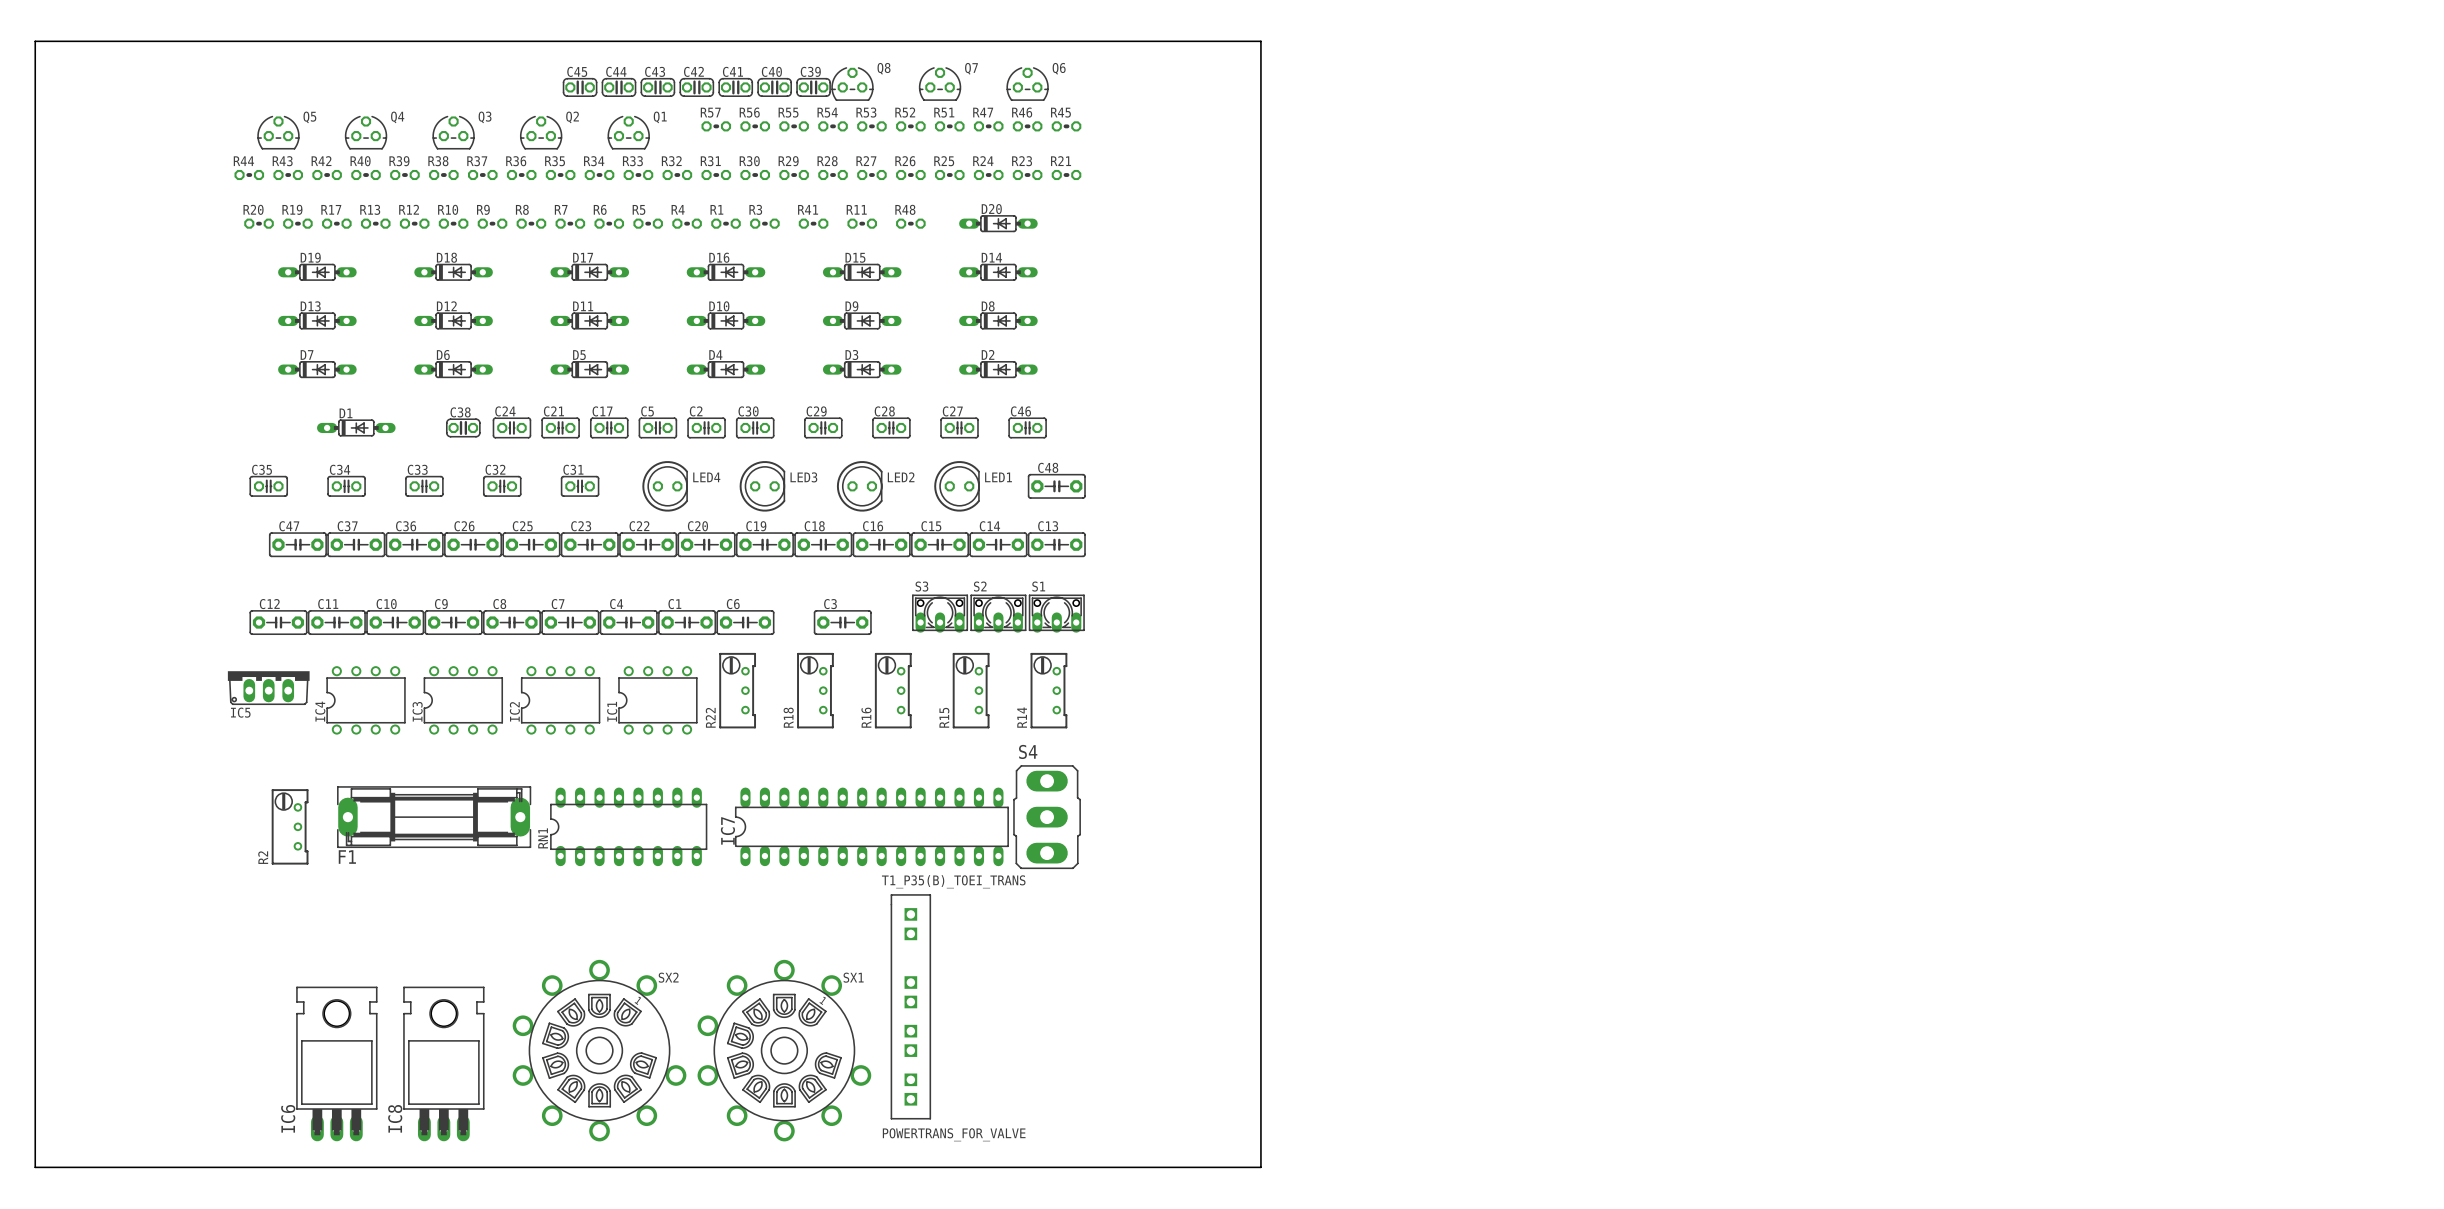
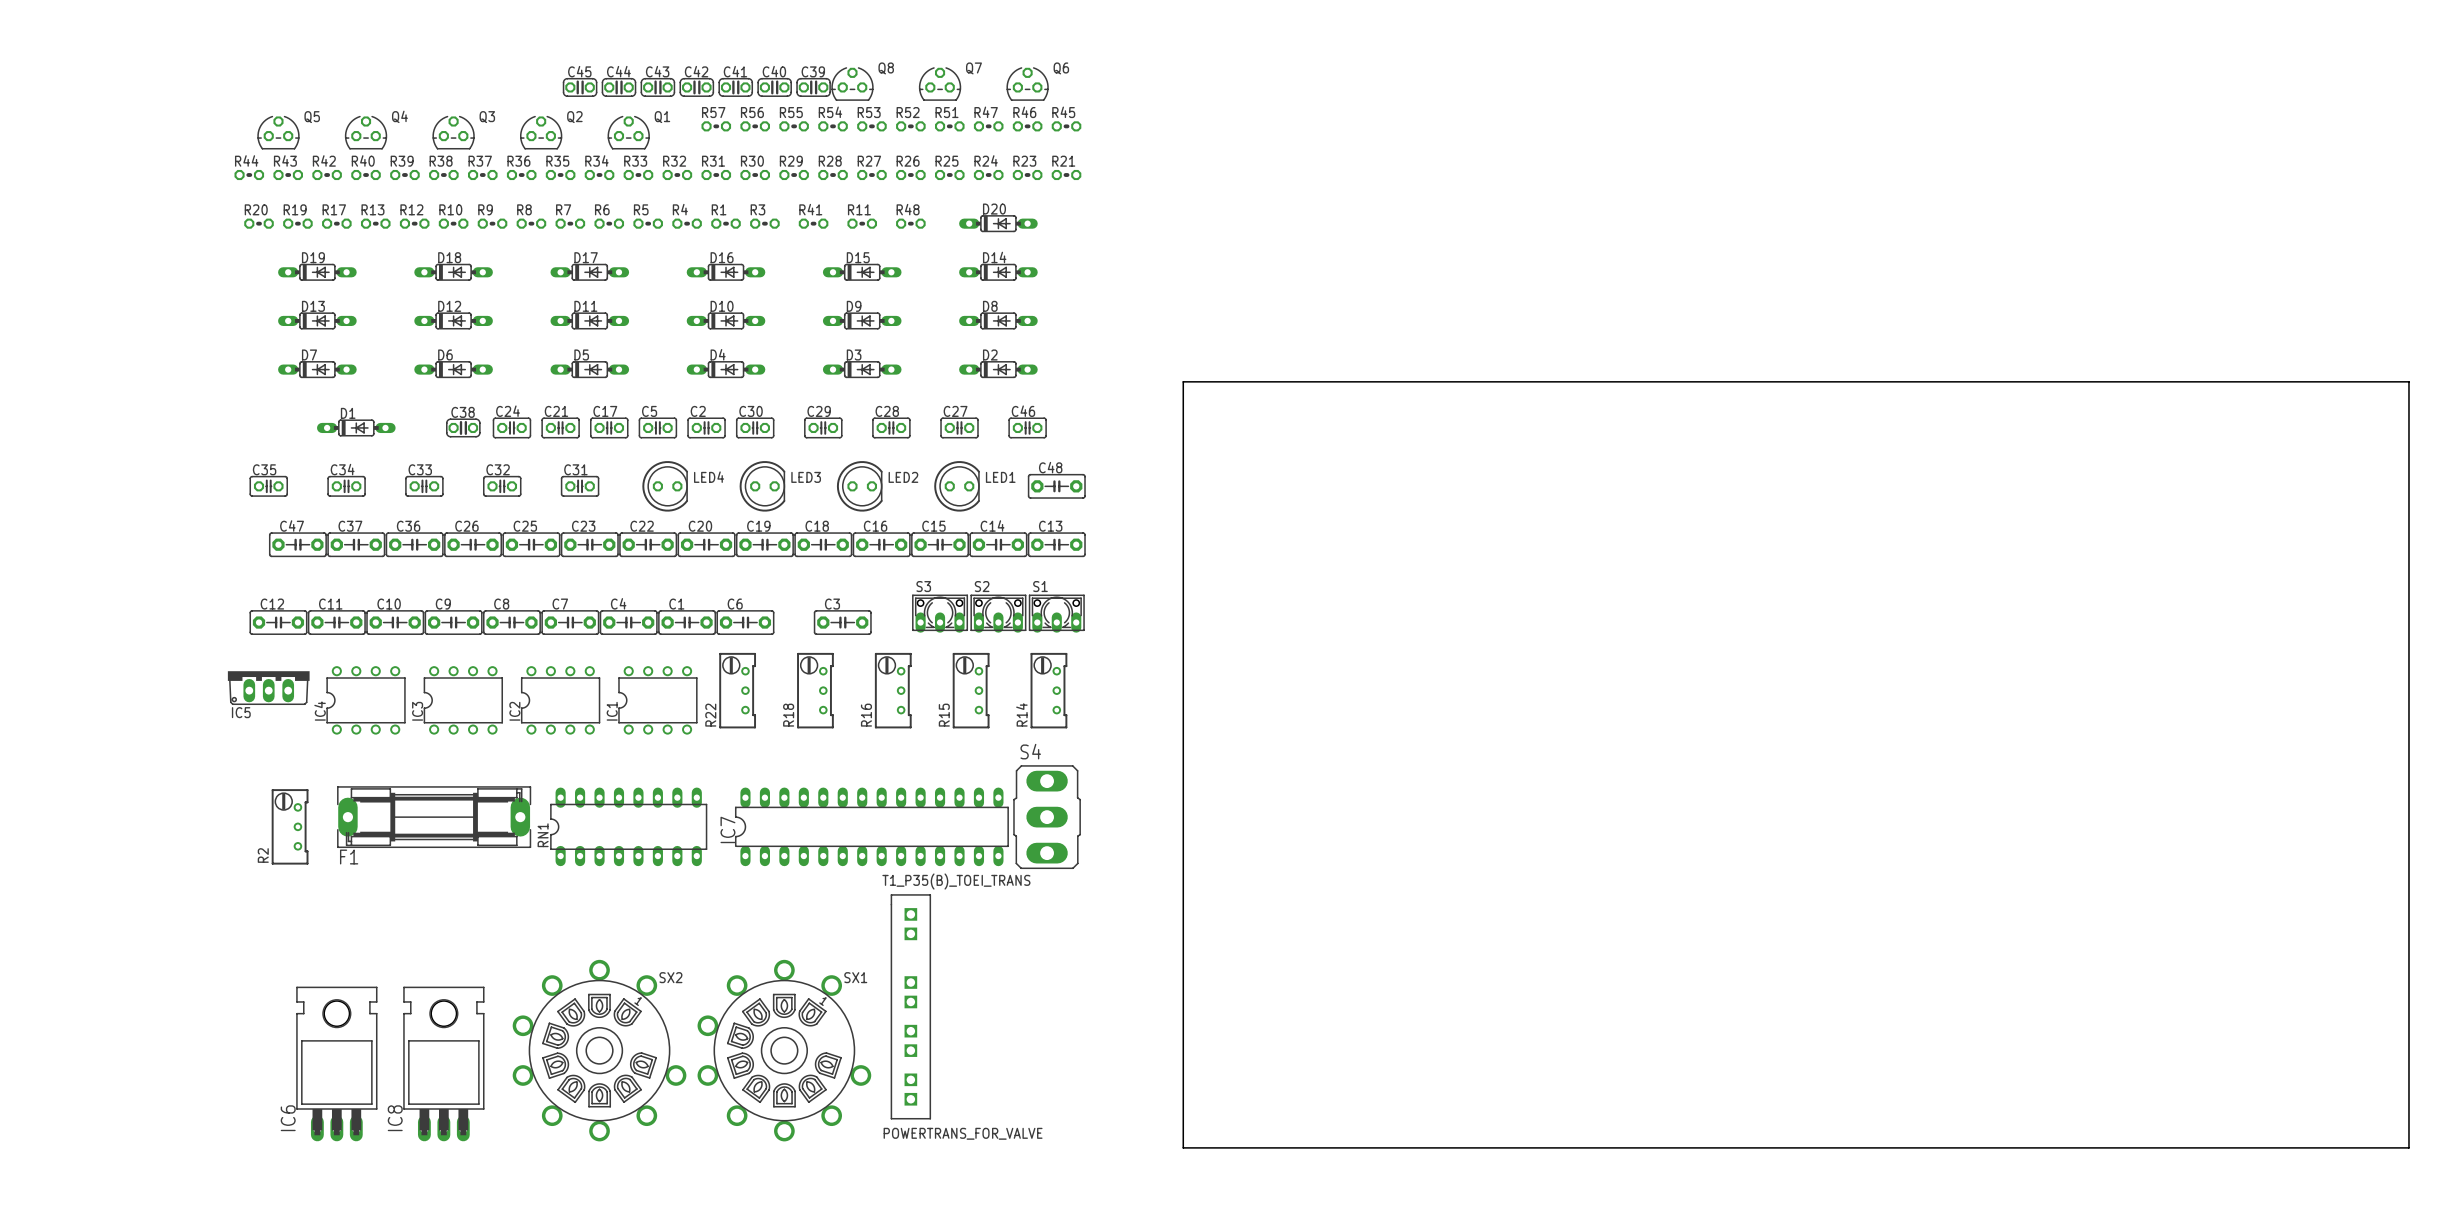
board edge: (35, 41) (1260, 41) (1260, 1167) (35, 1167) (35, 41) -> none
board edge: none -> (1183, 381) (2408, 381) (2408, 1147) (1183, 1147) (1183, 381)

